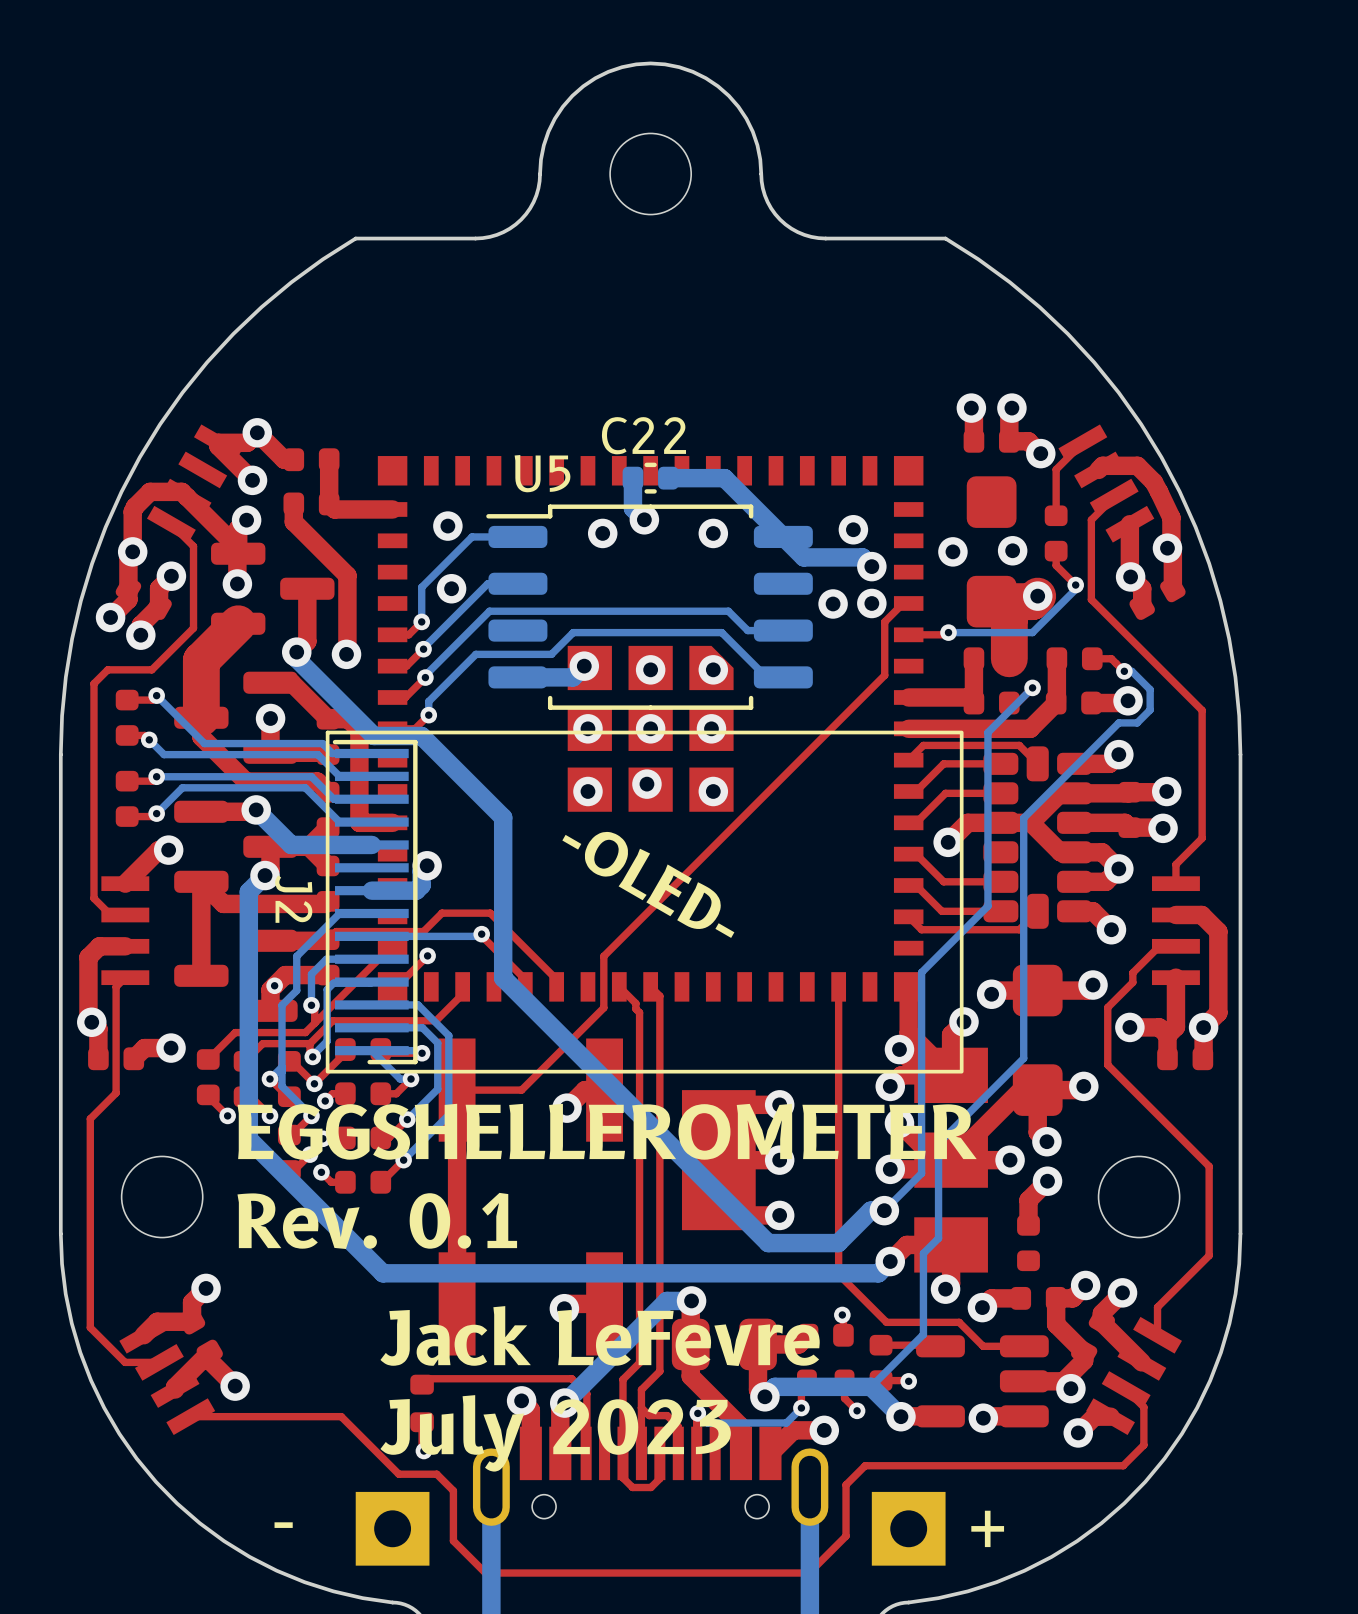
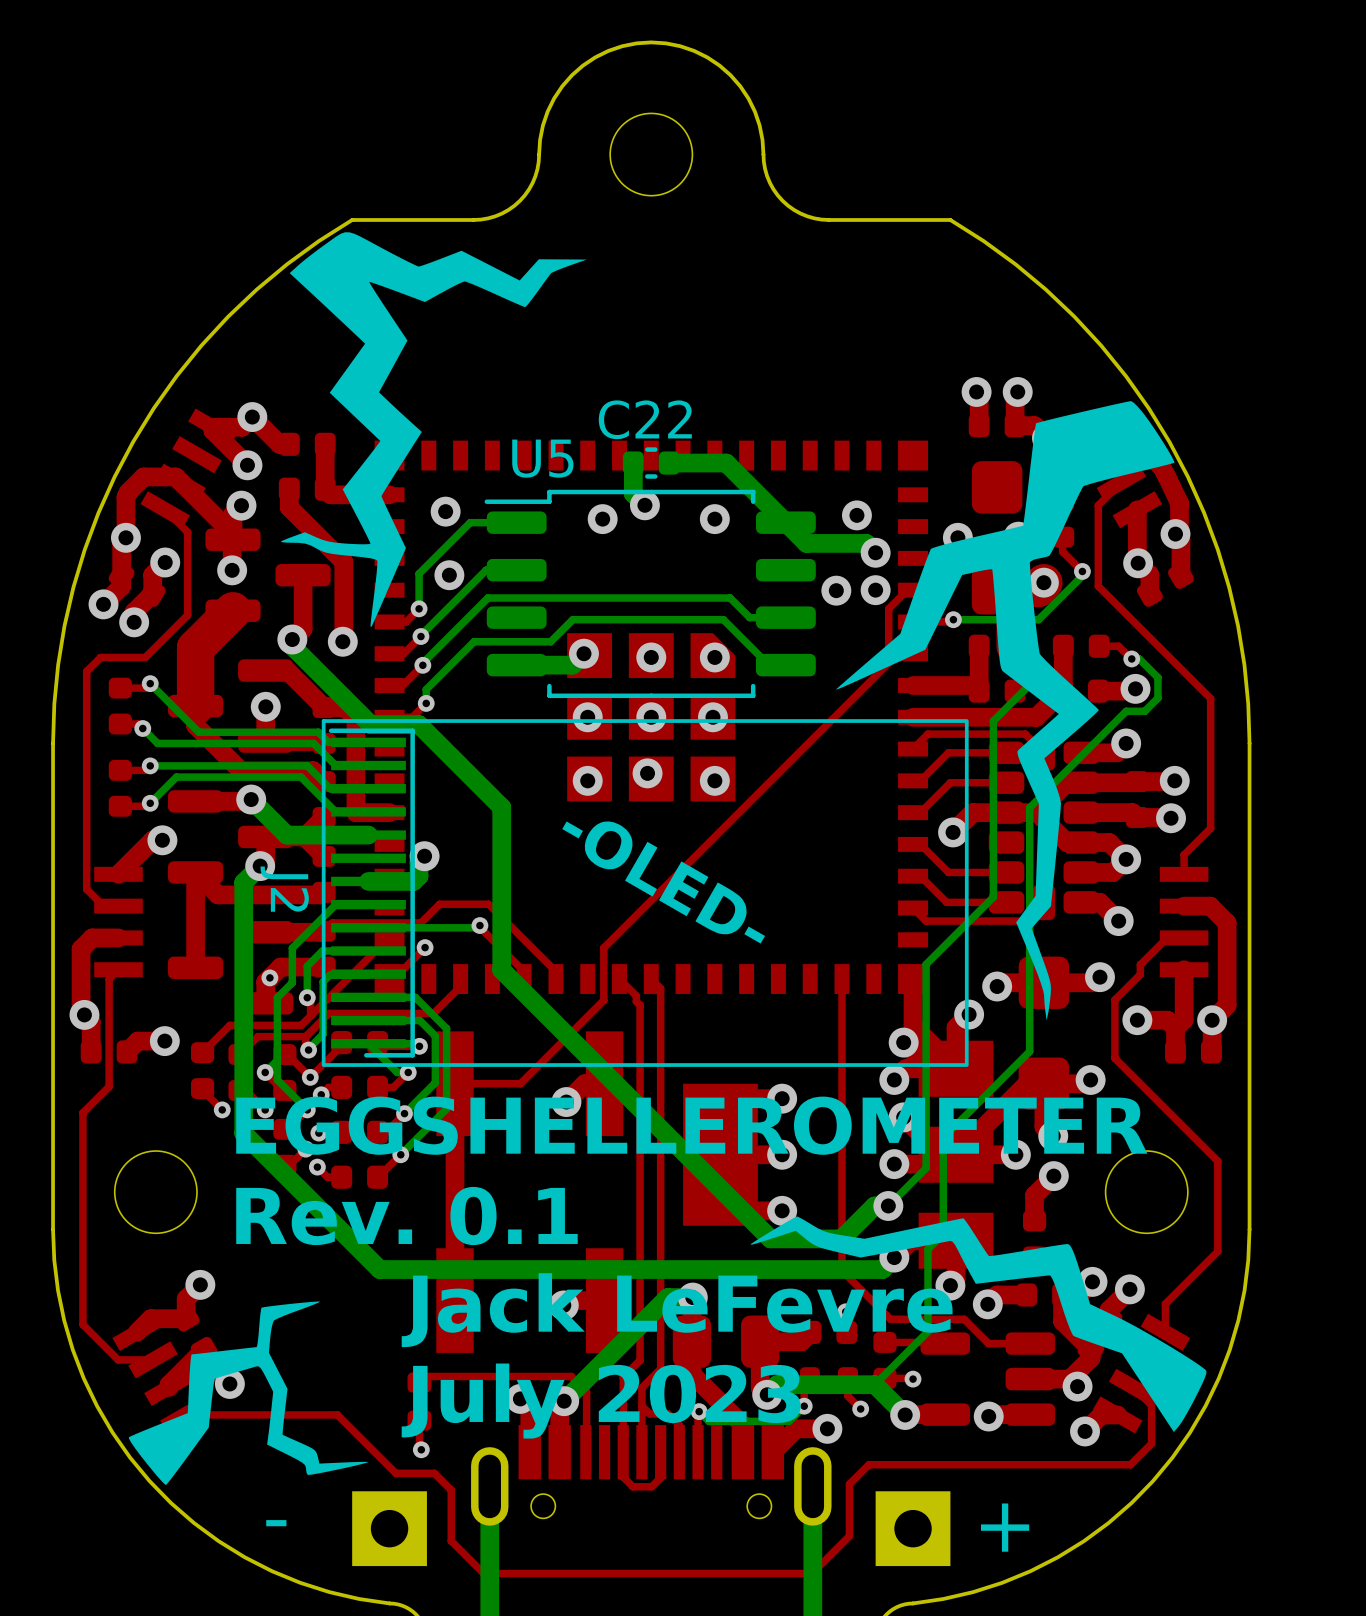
drawing: none -> [128, 232, 1207, 1486]
text position: Jack LeFevre (600, 1336) -> Jack LeFevre (677, 1310)
text position: July 2023 (555, 1433) -> July 2023 (601, 1401)

